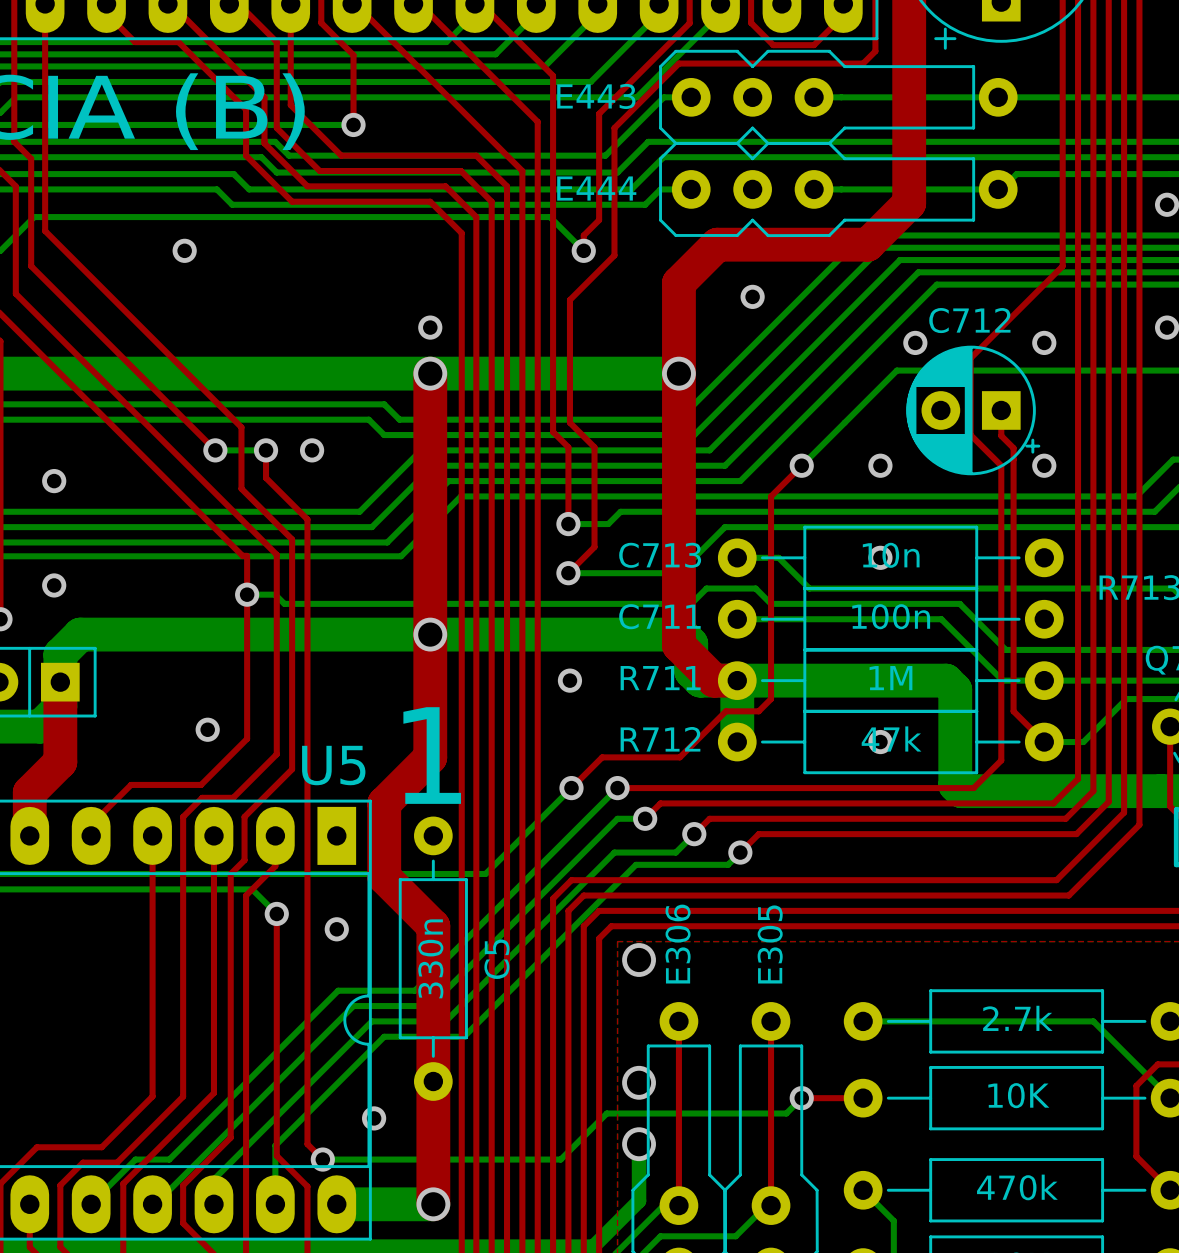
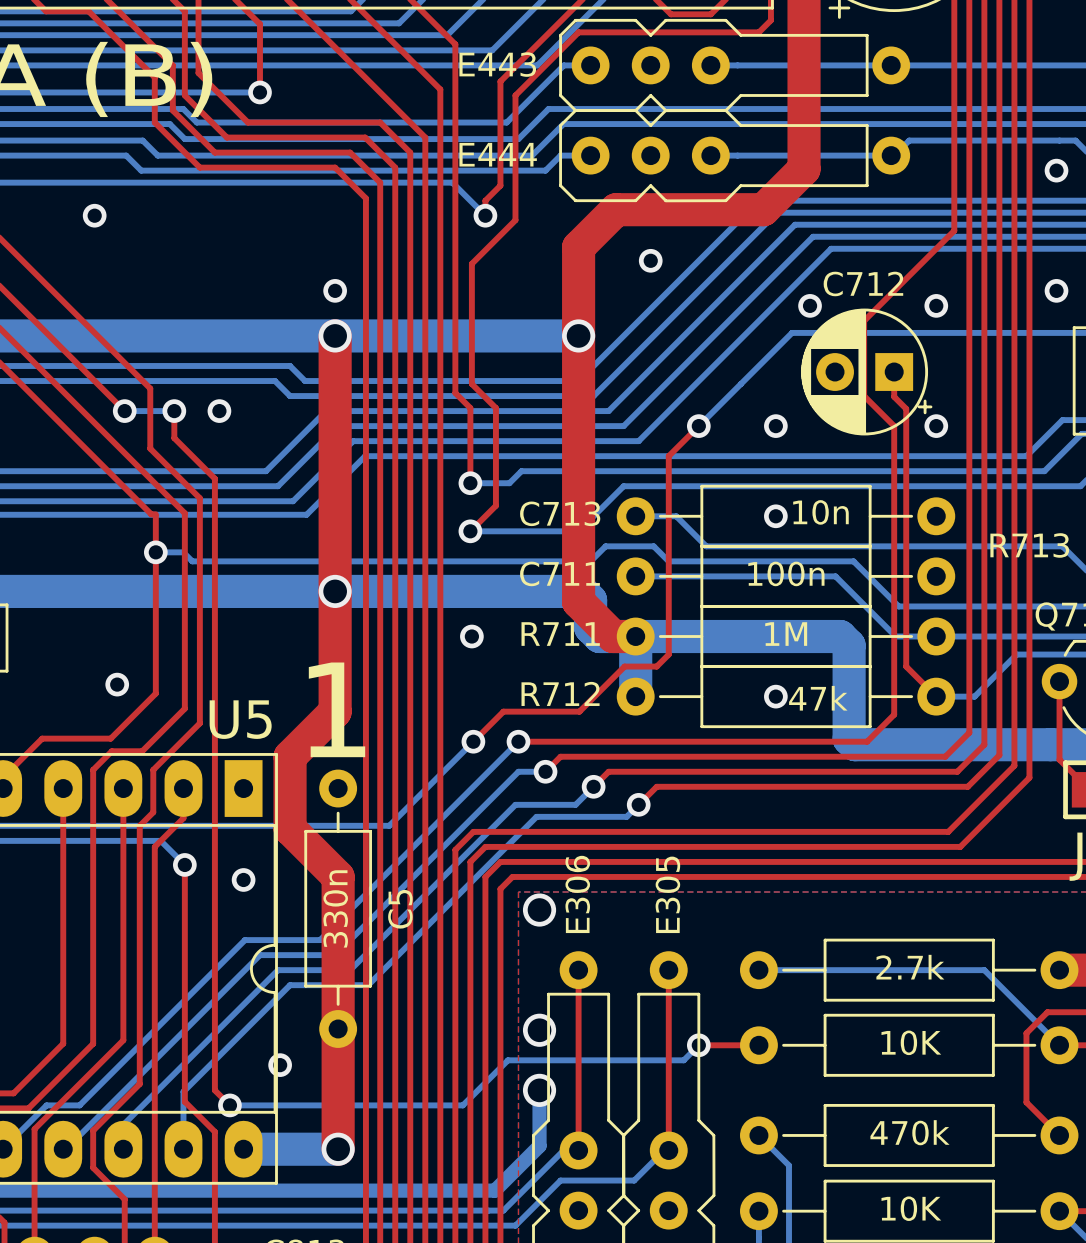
C713 value position: 10n (891, 555) -> 10n (820, 512)
R712 value position: 47k (891, 738) -> 47k (818, 698)

